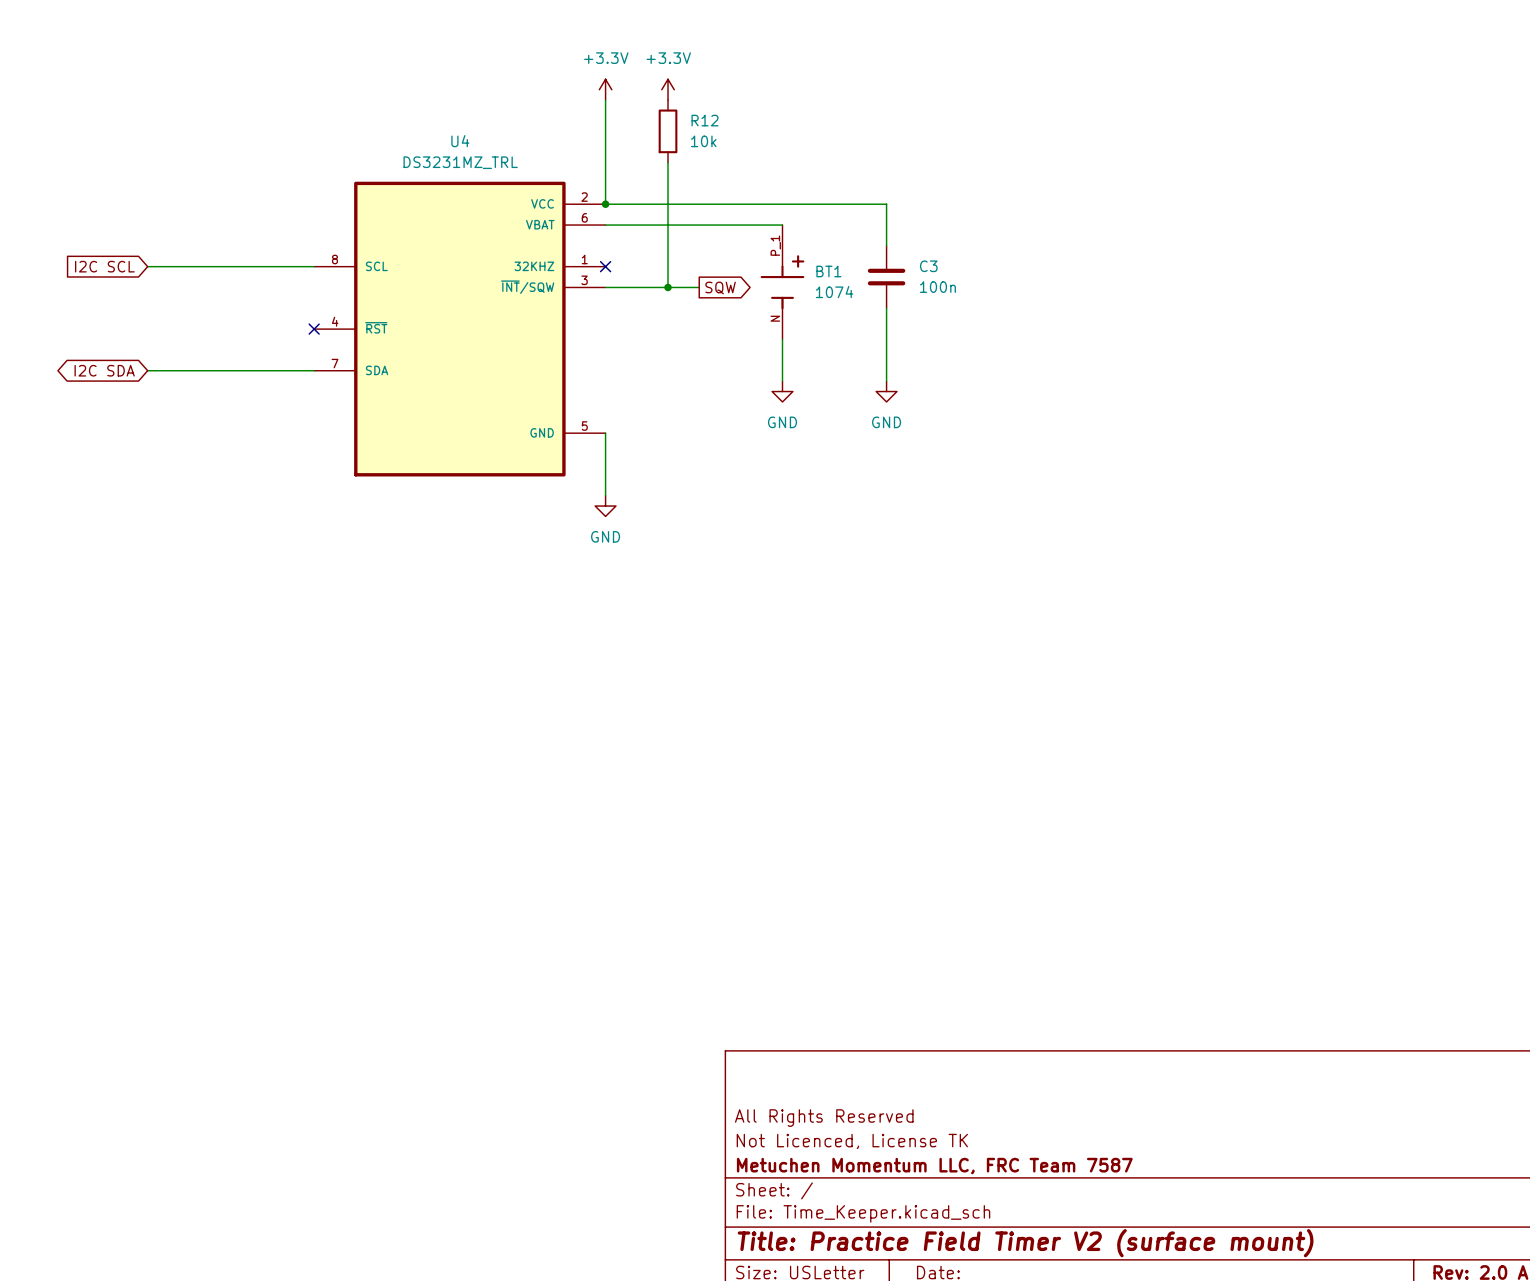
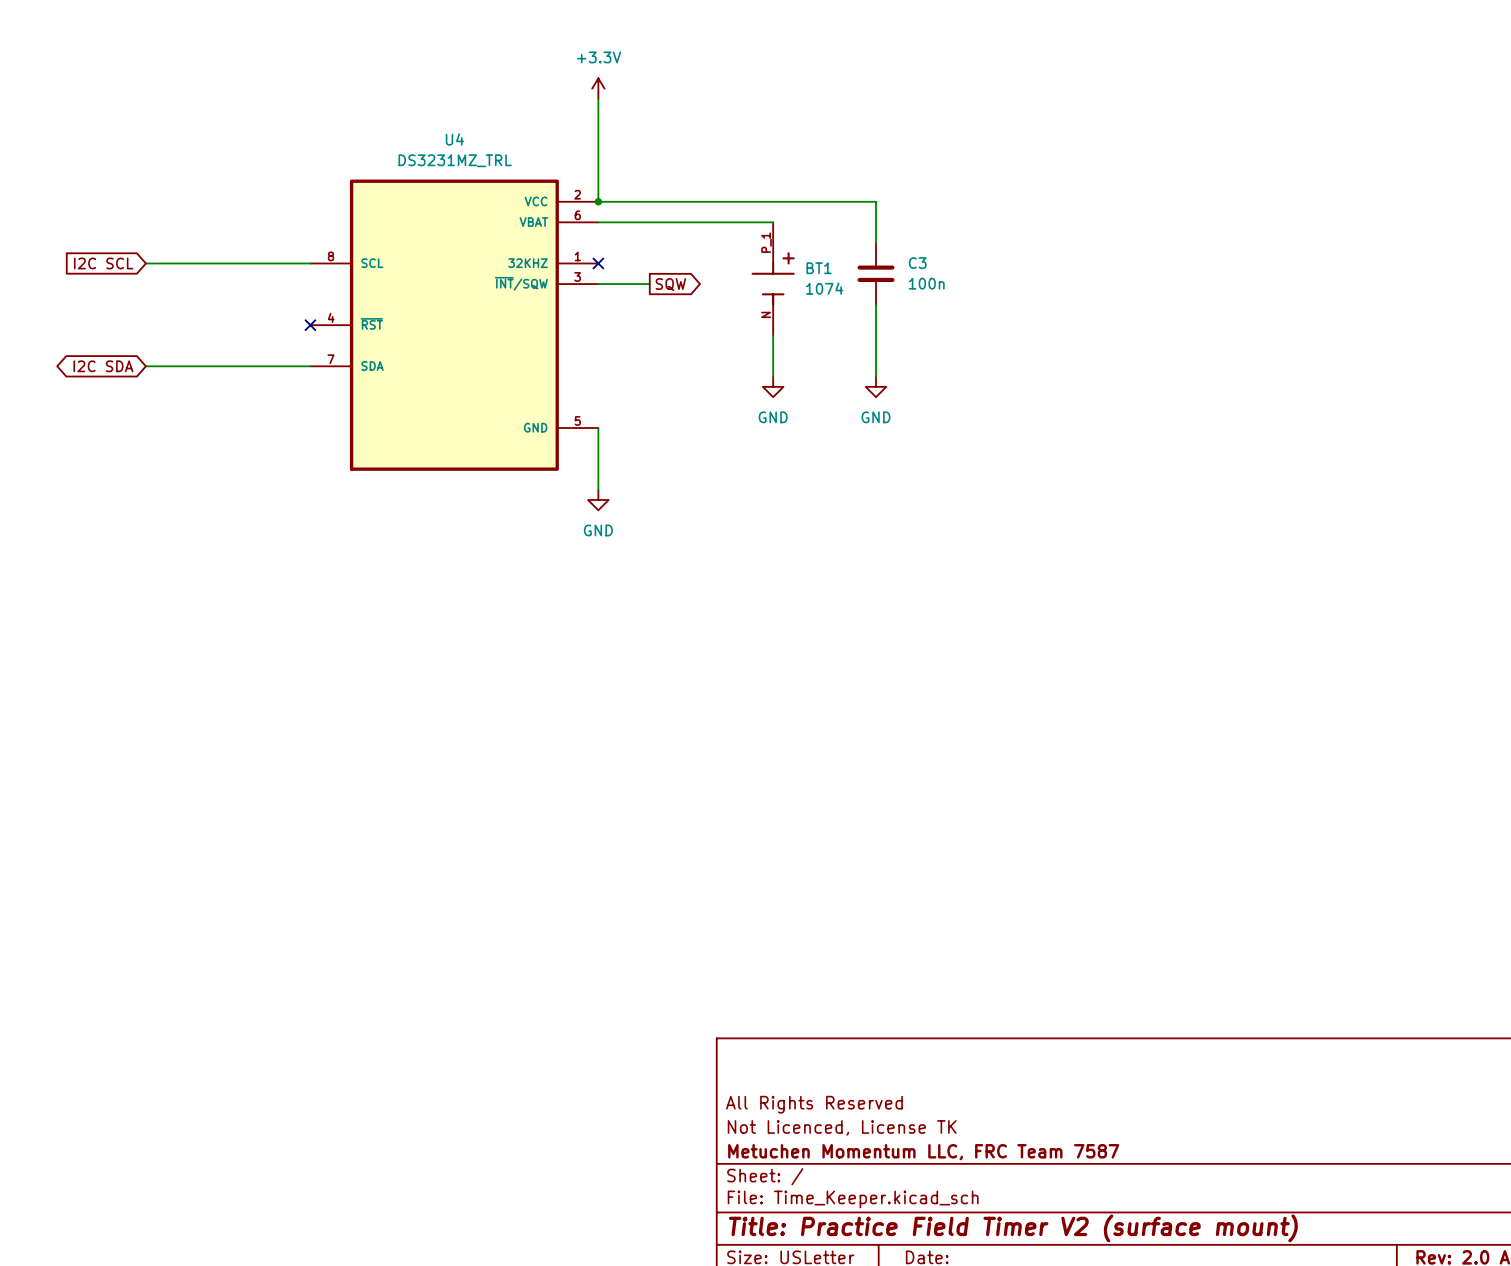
power symbol: +3.3V (668, 89) -> none
R12: 10k (668, 131) -> none
wire: (668, 162) (668, 287) -> none
wire: (657, 287) (699, 287) -> none
junction: (668, 287) -> none
global label position: SQW (720, 287) -> SQW (670, 284)

